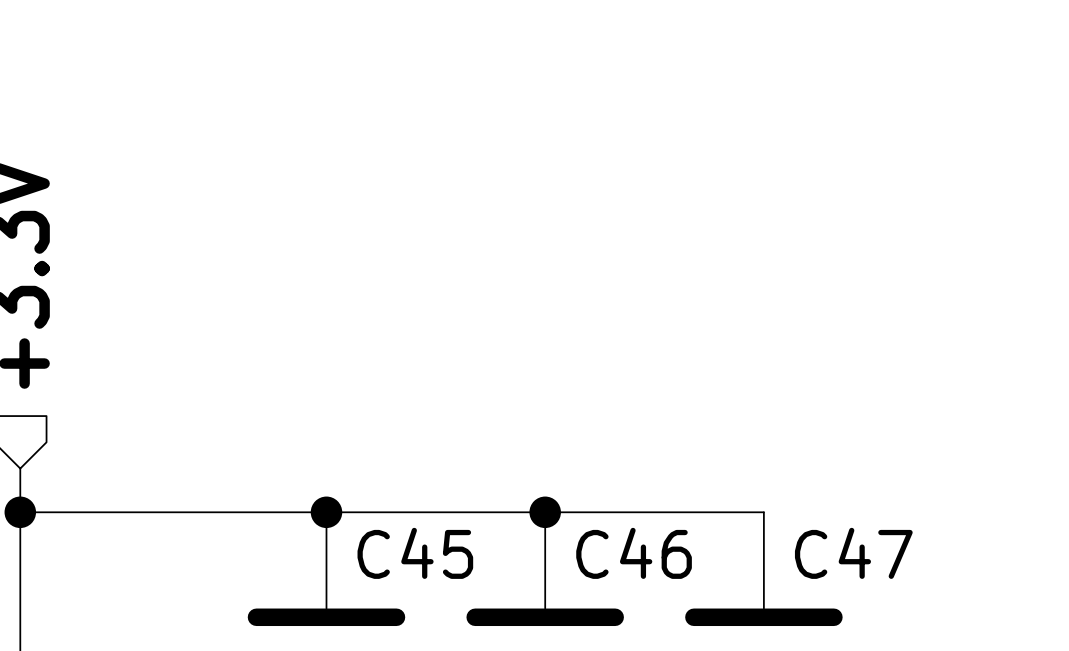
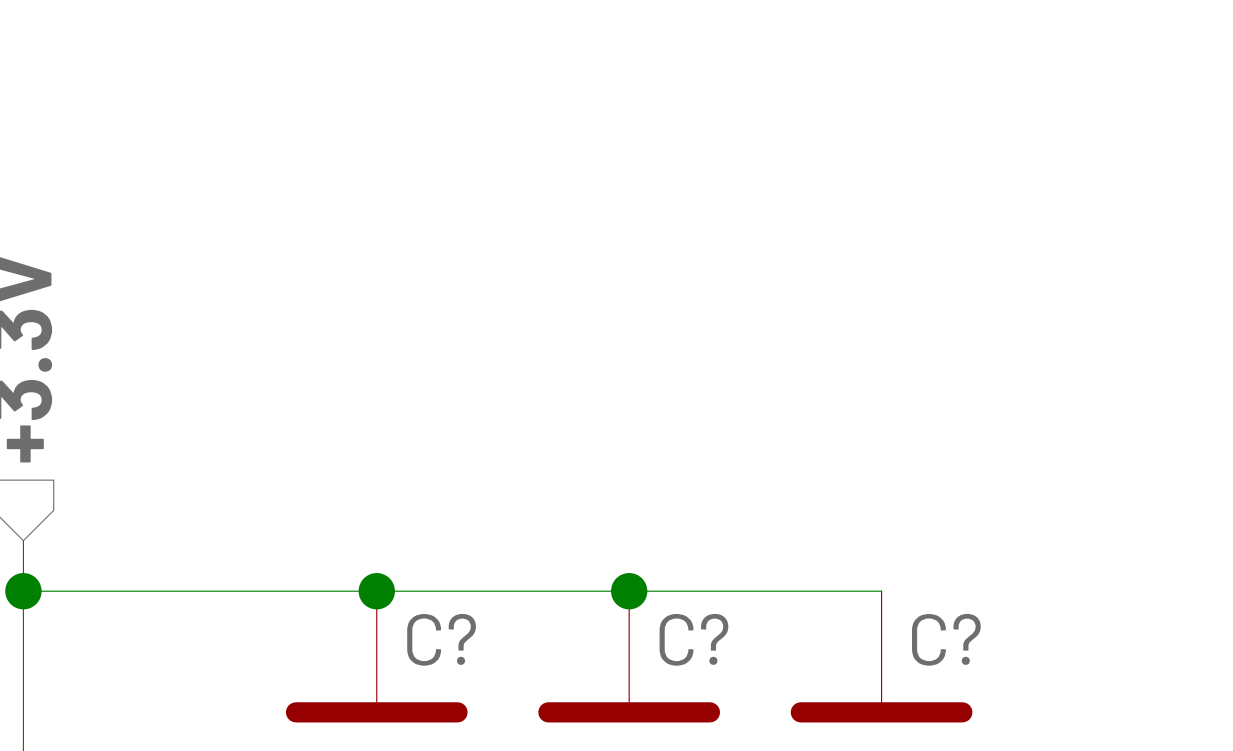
C45 name: C45 (415, 553) -> C? (441, 639)
C46 name: C46 (634, 553) -> C? (693, 639)
C47 name: C47 (853, 553) -> C? (946, 639)

